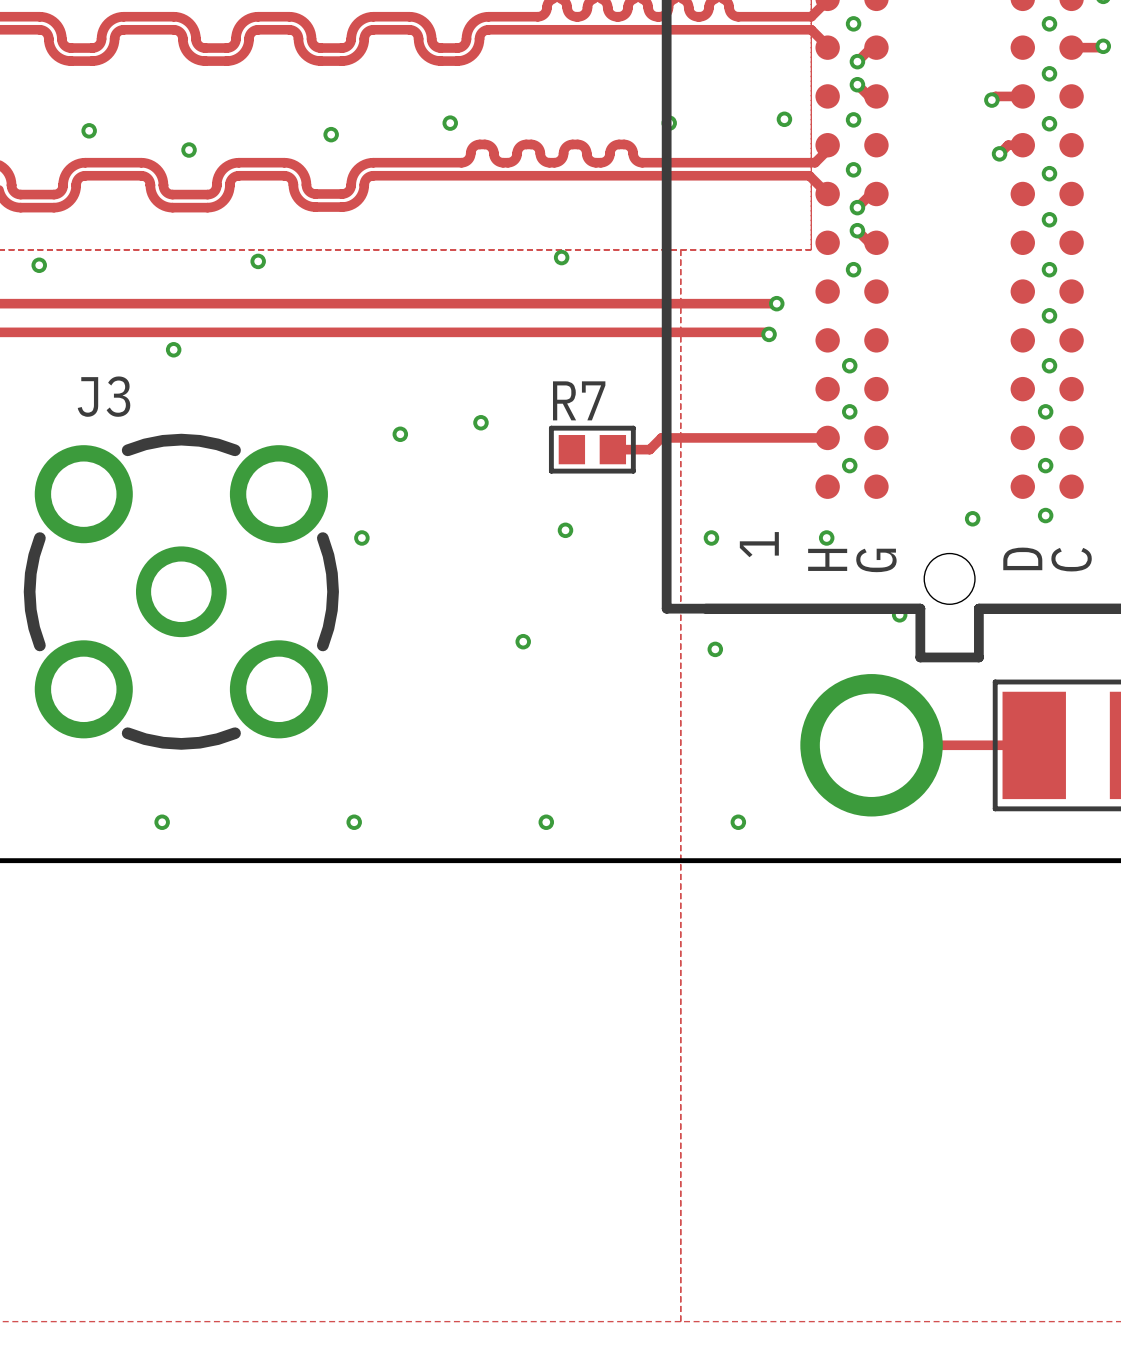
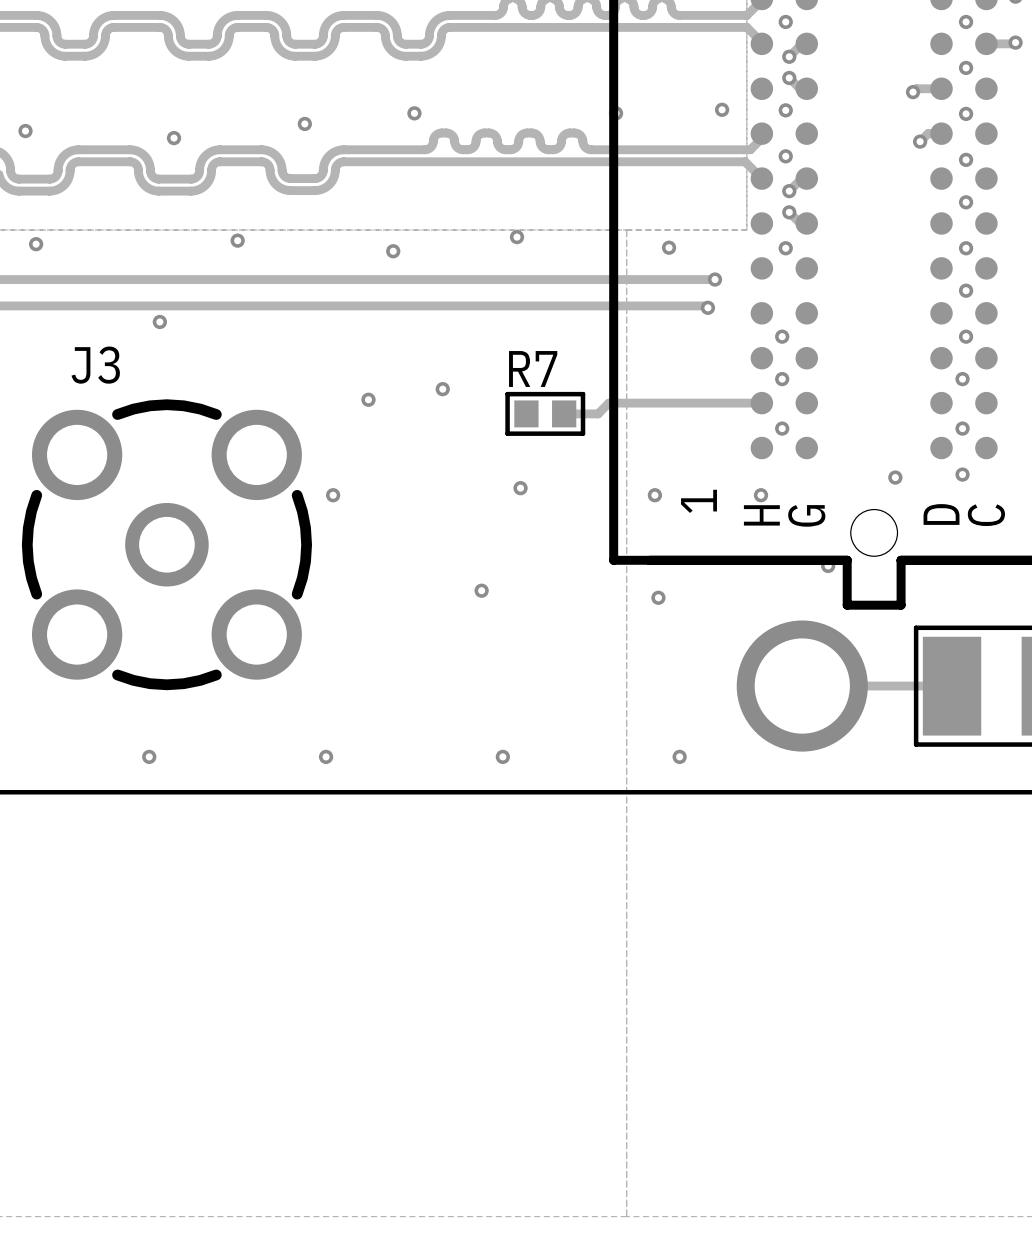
via position: (89, 130) -> (25, 131)
via: none -> (669, 247)
via: none -> (393, 251)

